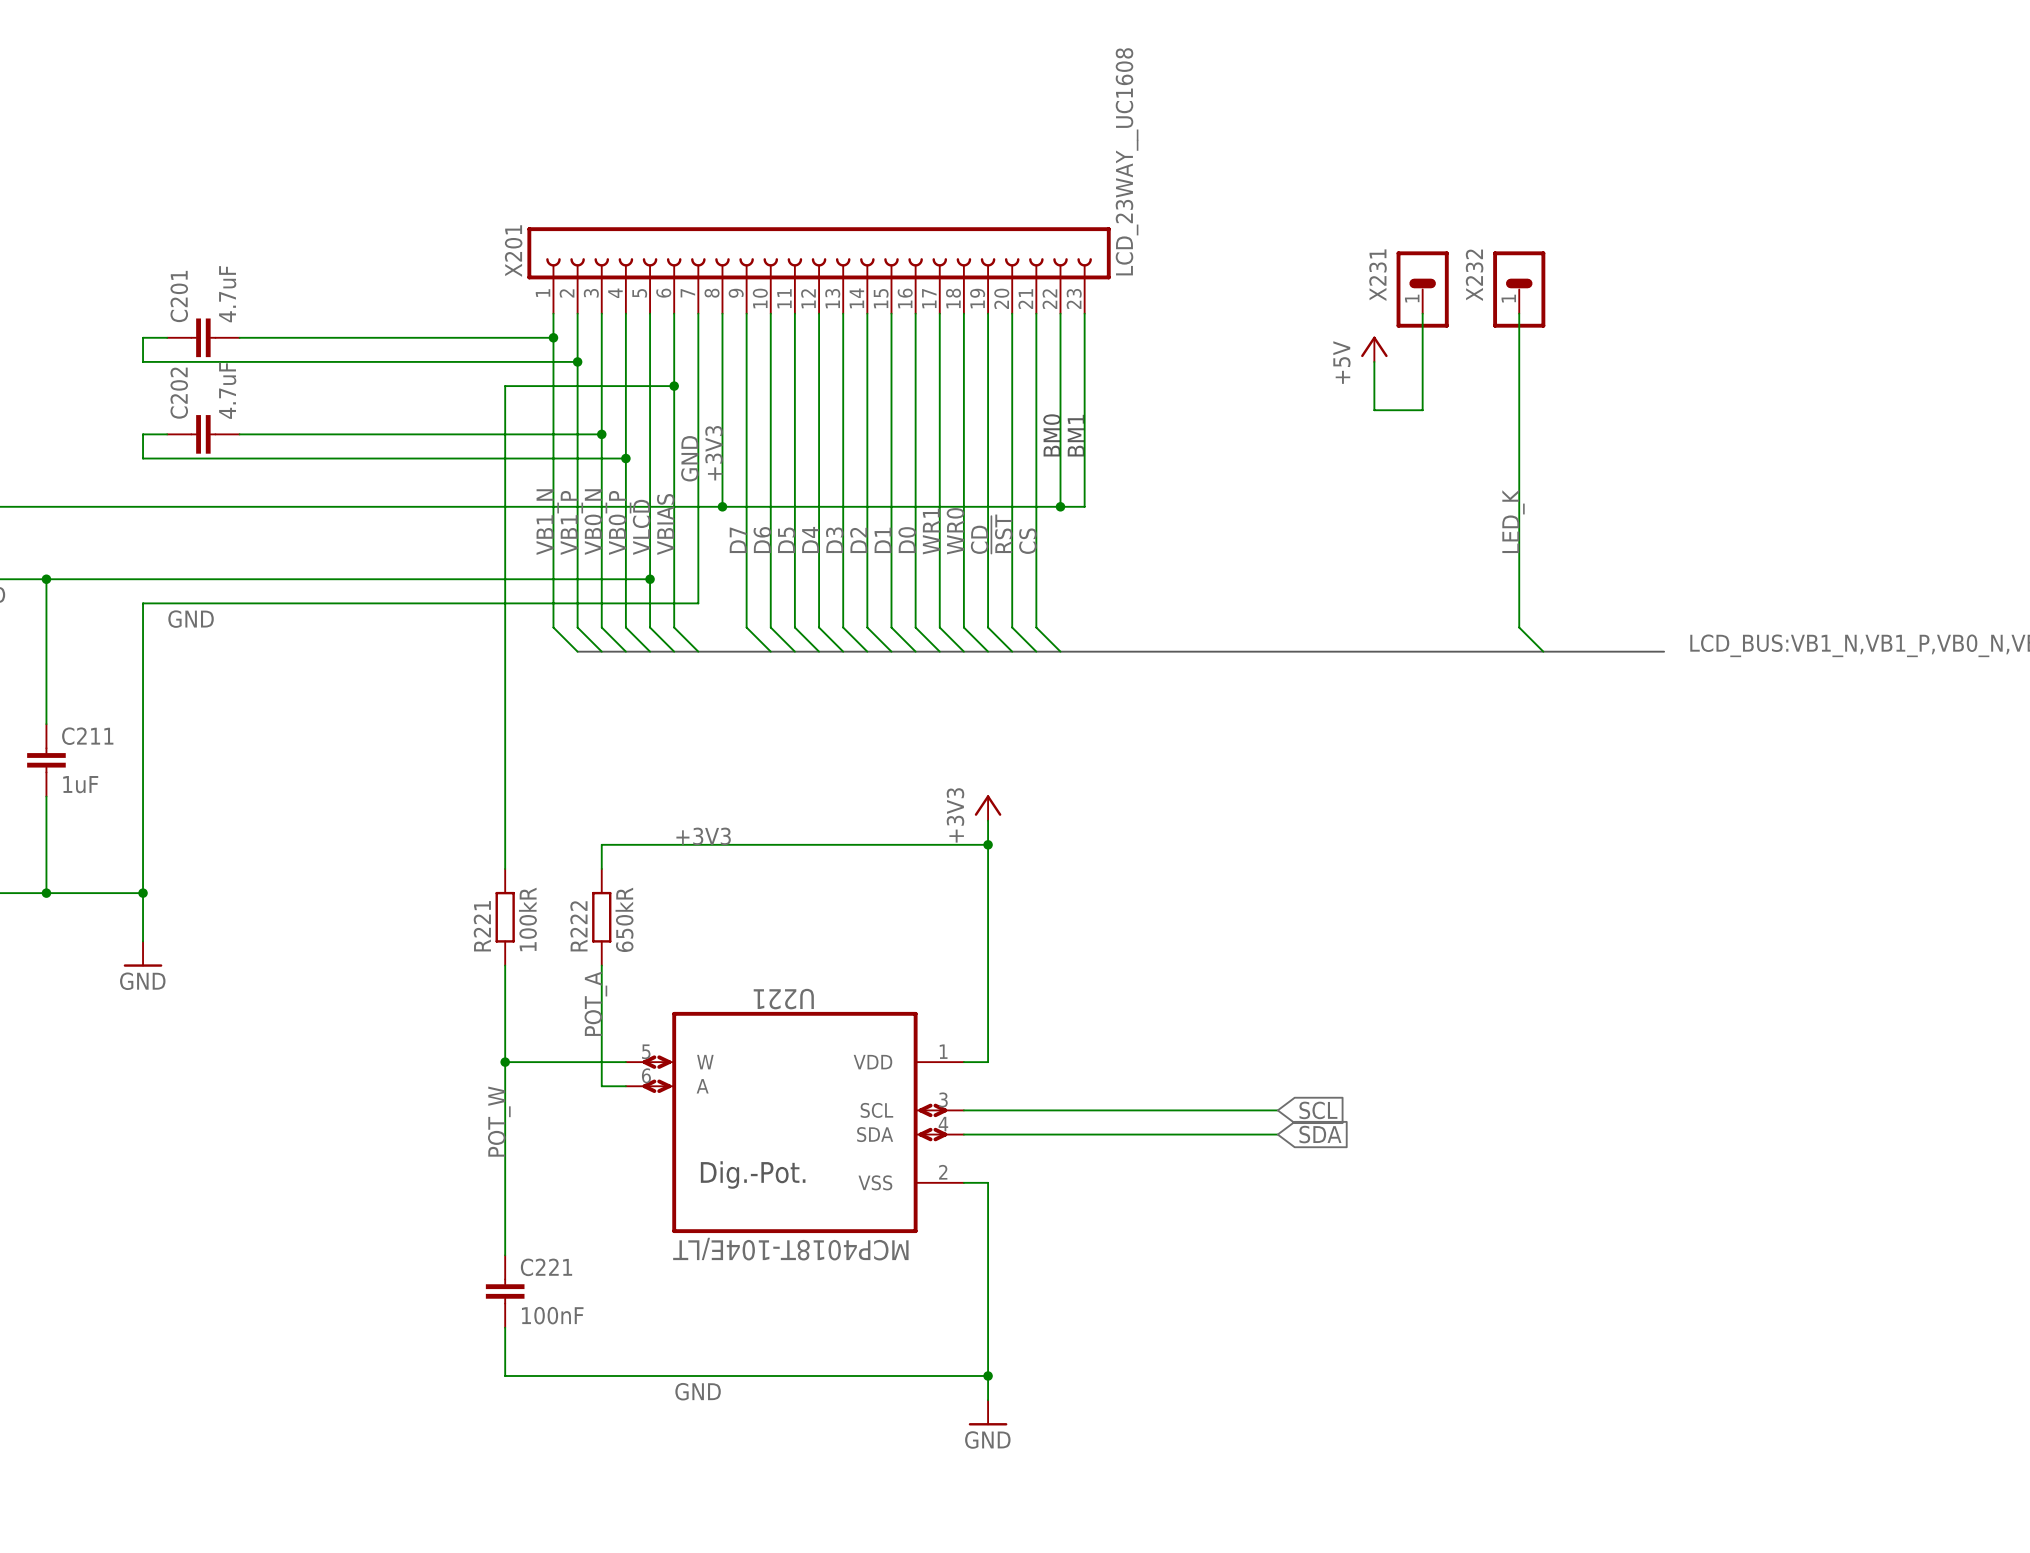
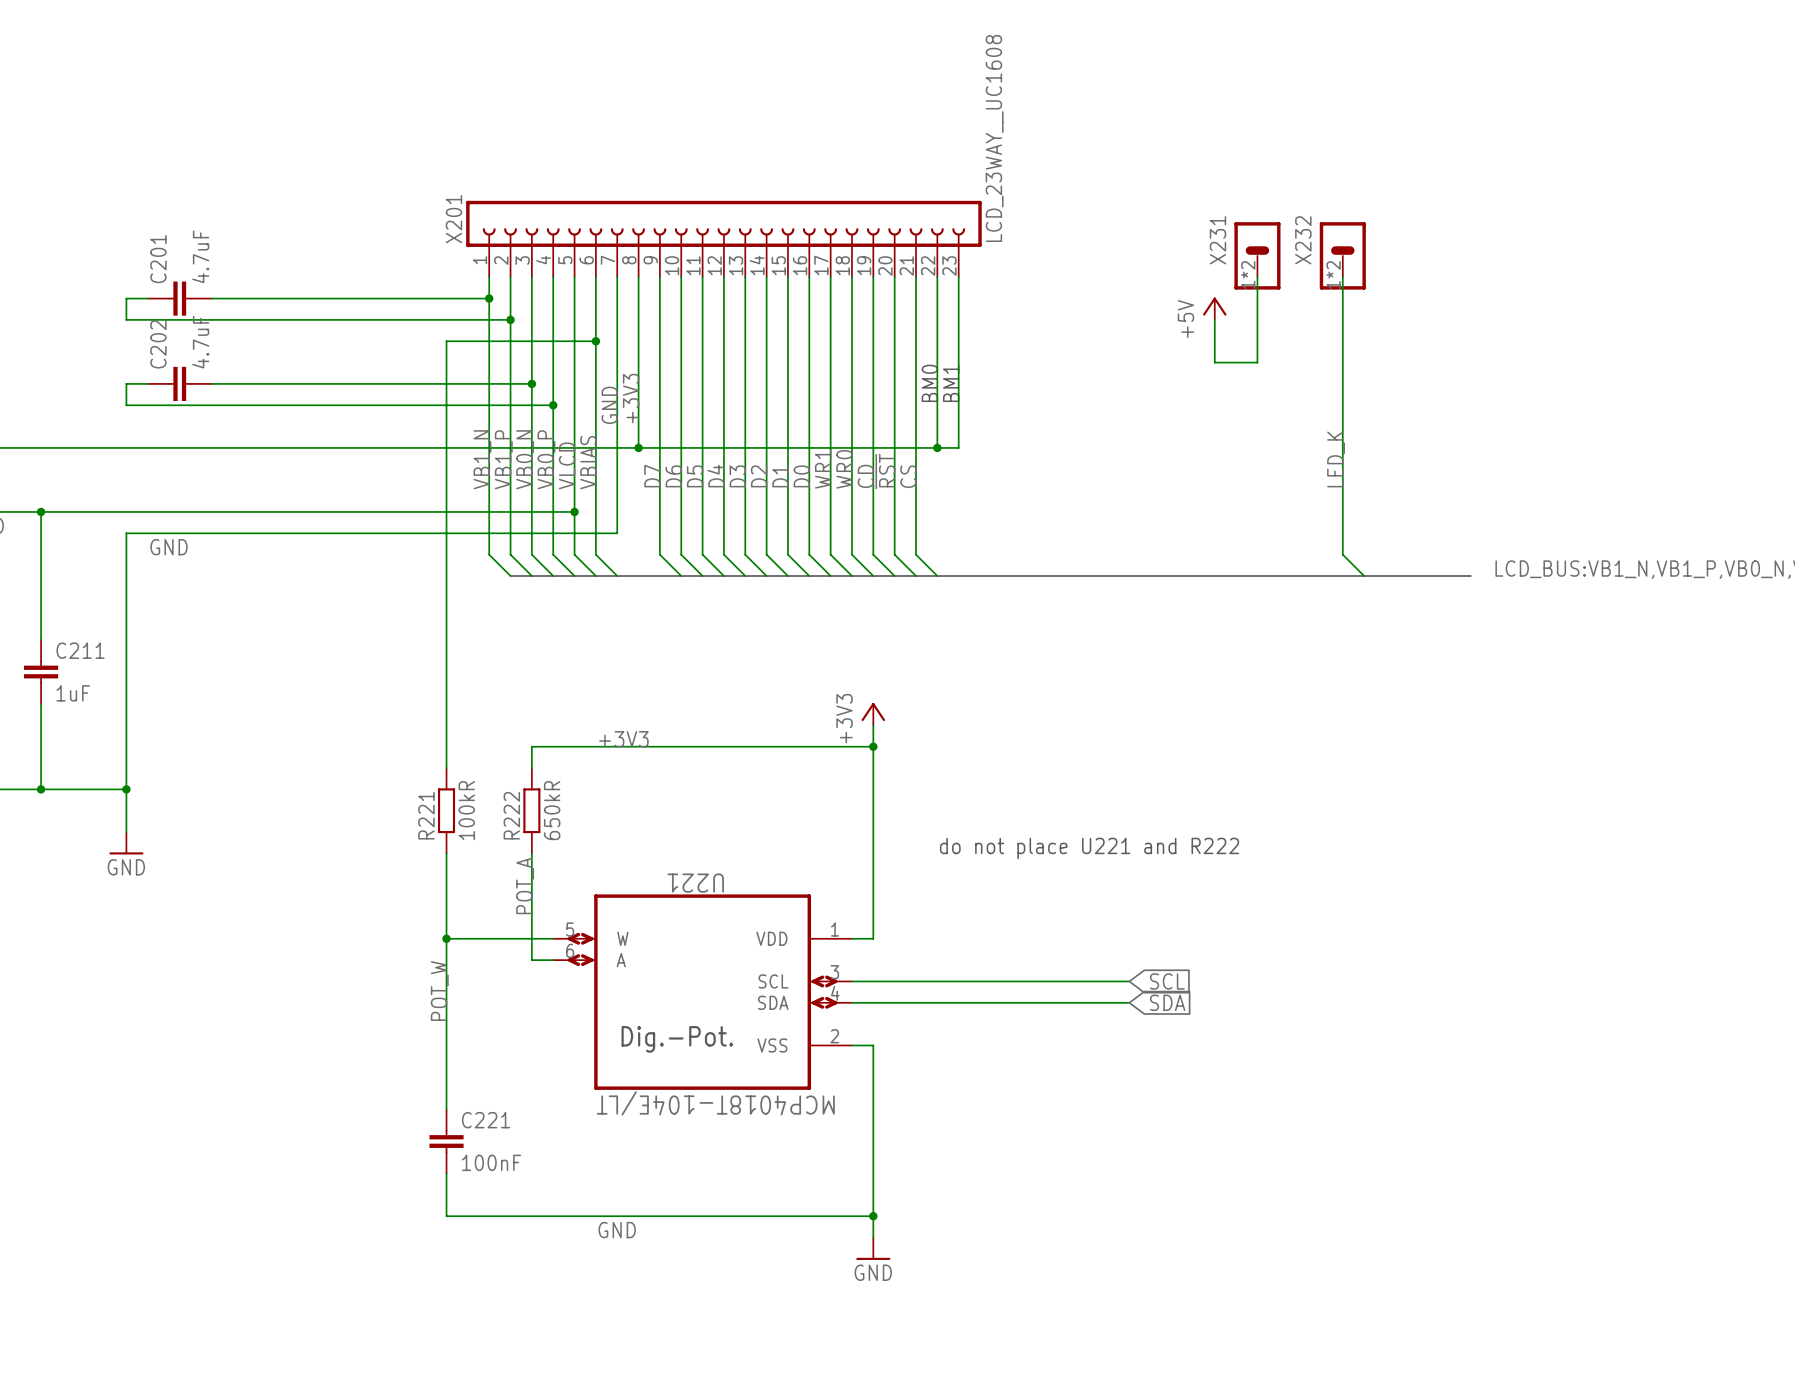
X231 pin number: 1 (1412, 298) -> 1*2 (1248, 275)
X232 pin number: 1 (1508, 298) -> 1*2 (1333, 275)
text: none -> do not place U221 and R222 (1089, 848)

